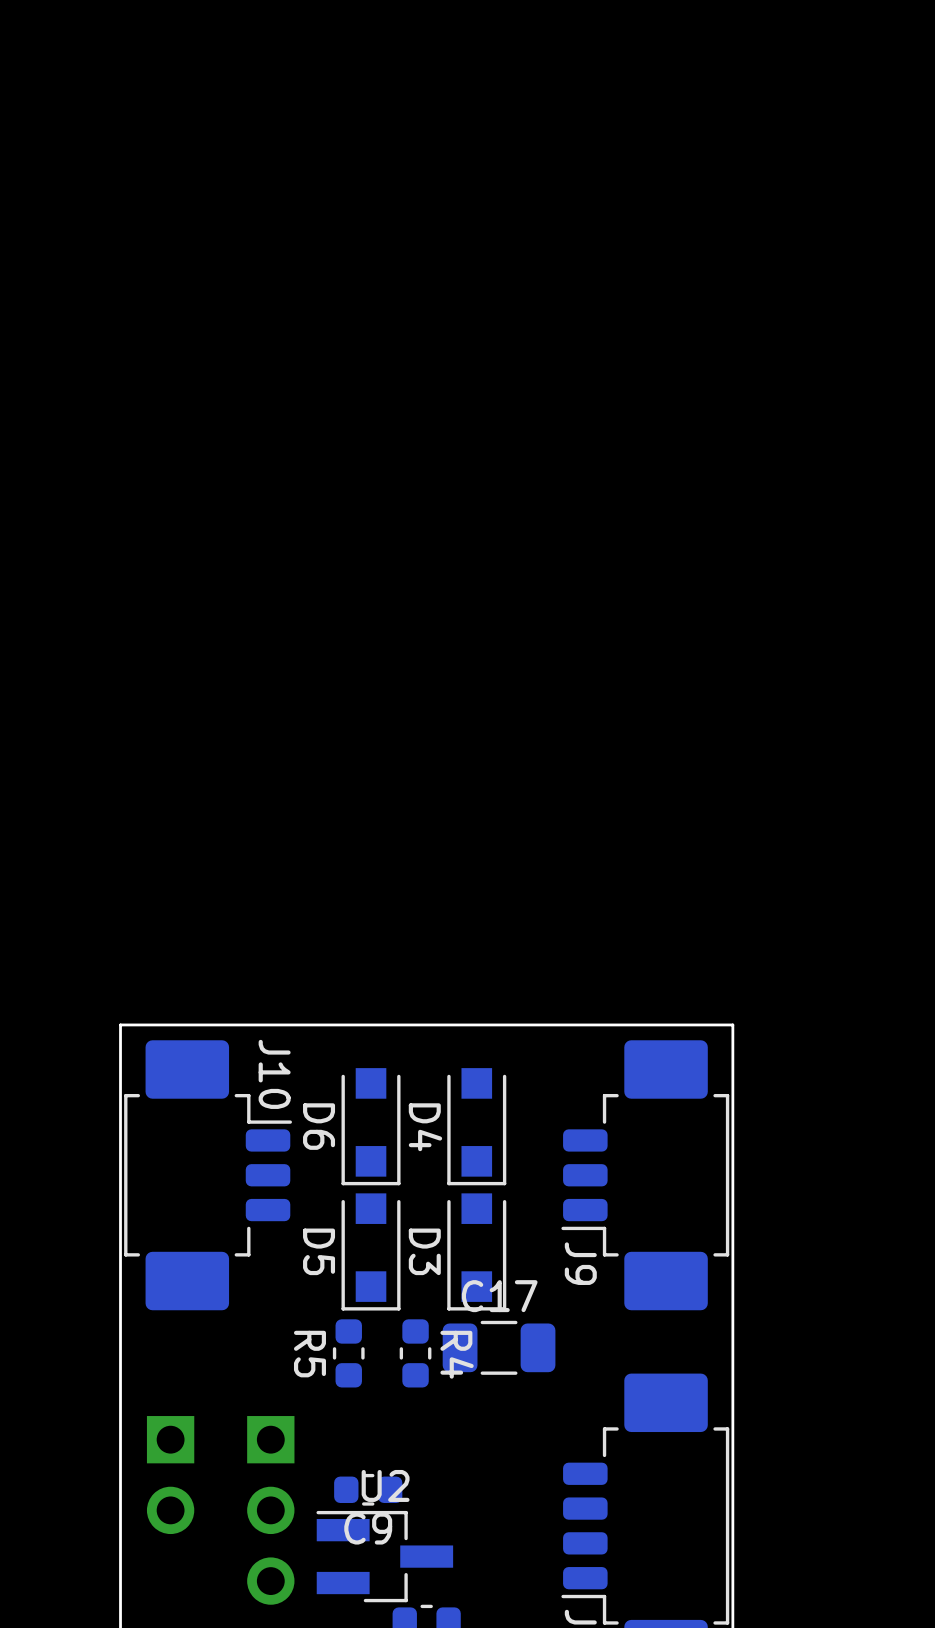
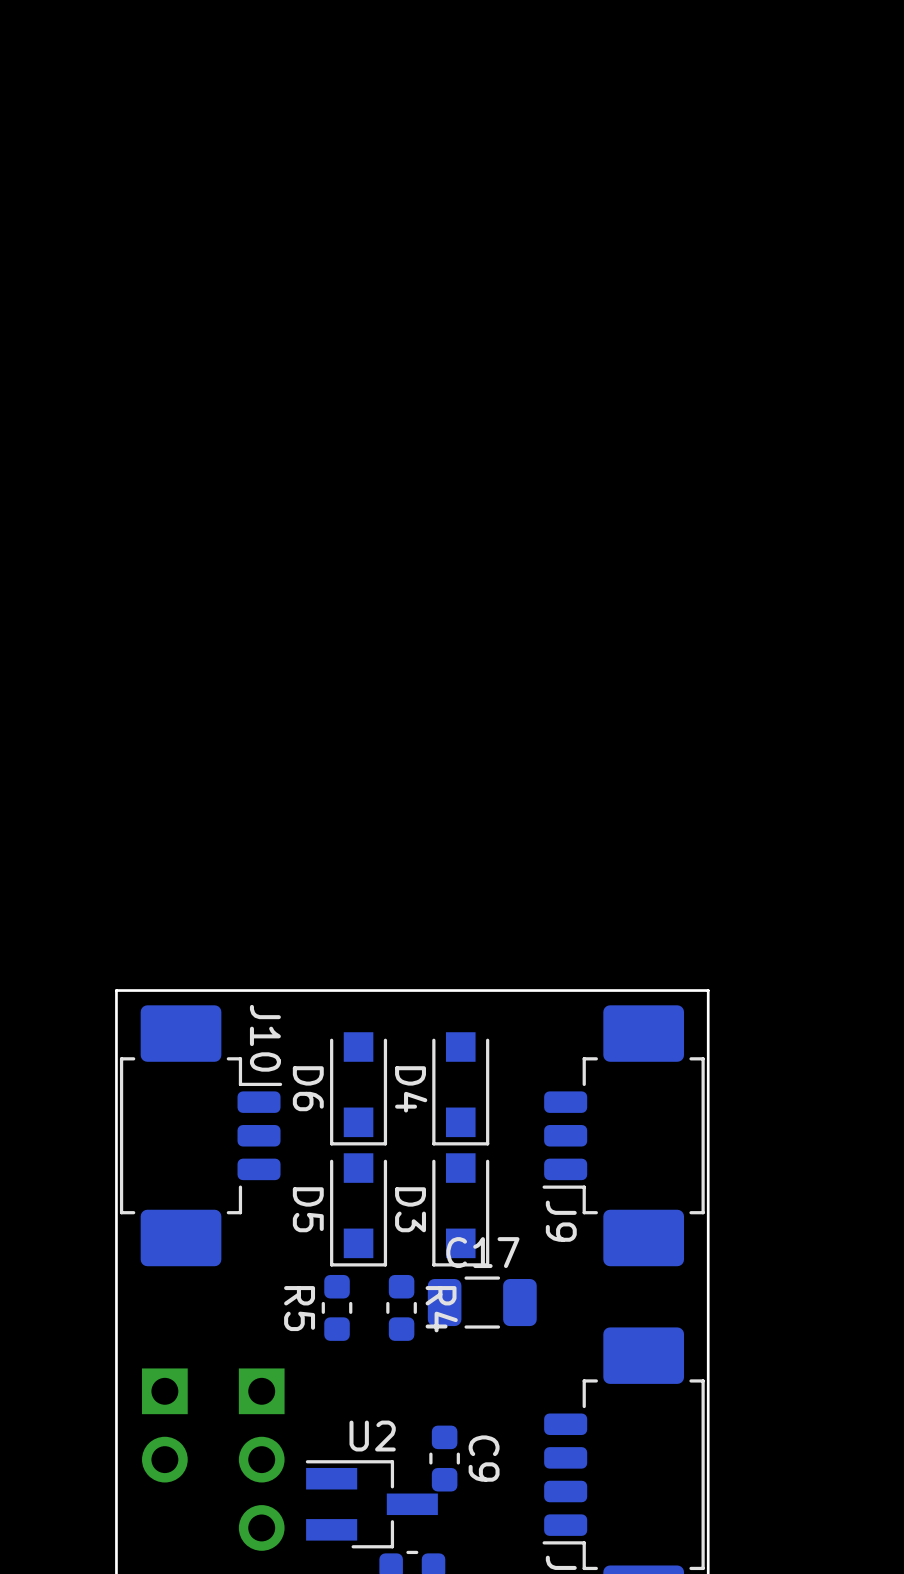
C9 rotation: 0° (368, 1489) -> 90° clockwise (444, 1458)
C9 position: (368, 1489) -> (444, 1458)
C9 name position: C9 (368, 1528) -> C9 (484, 1458)

